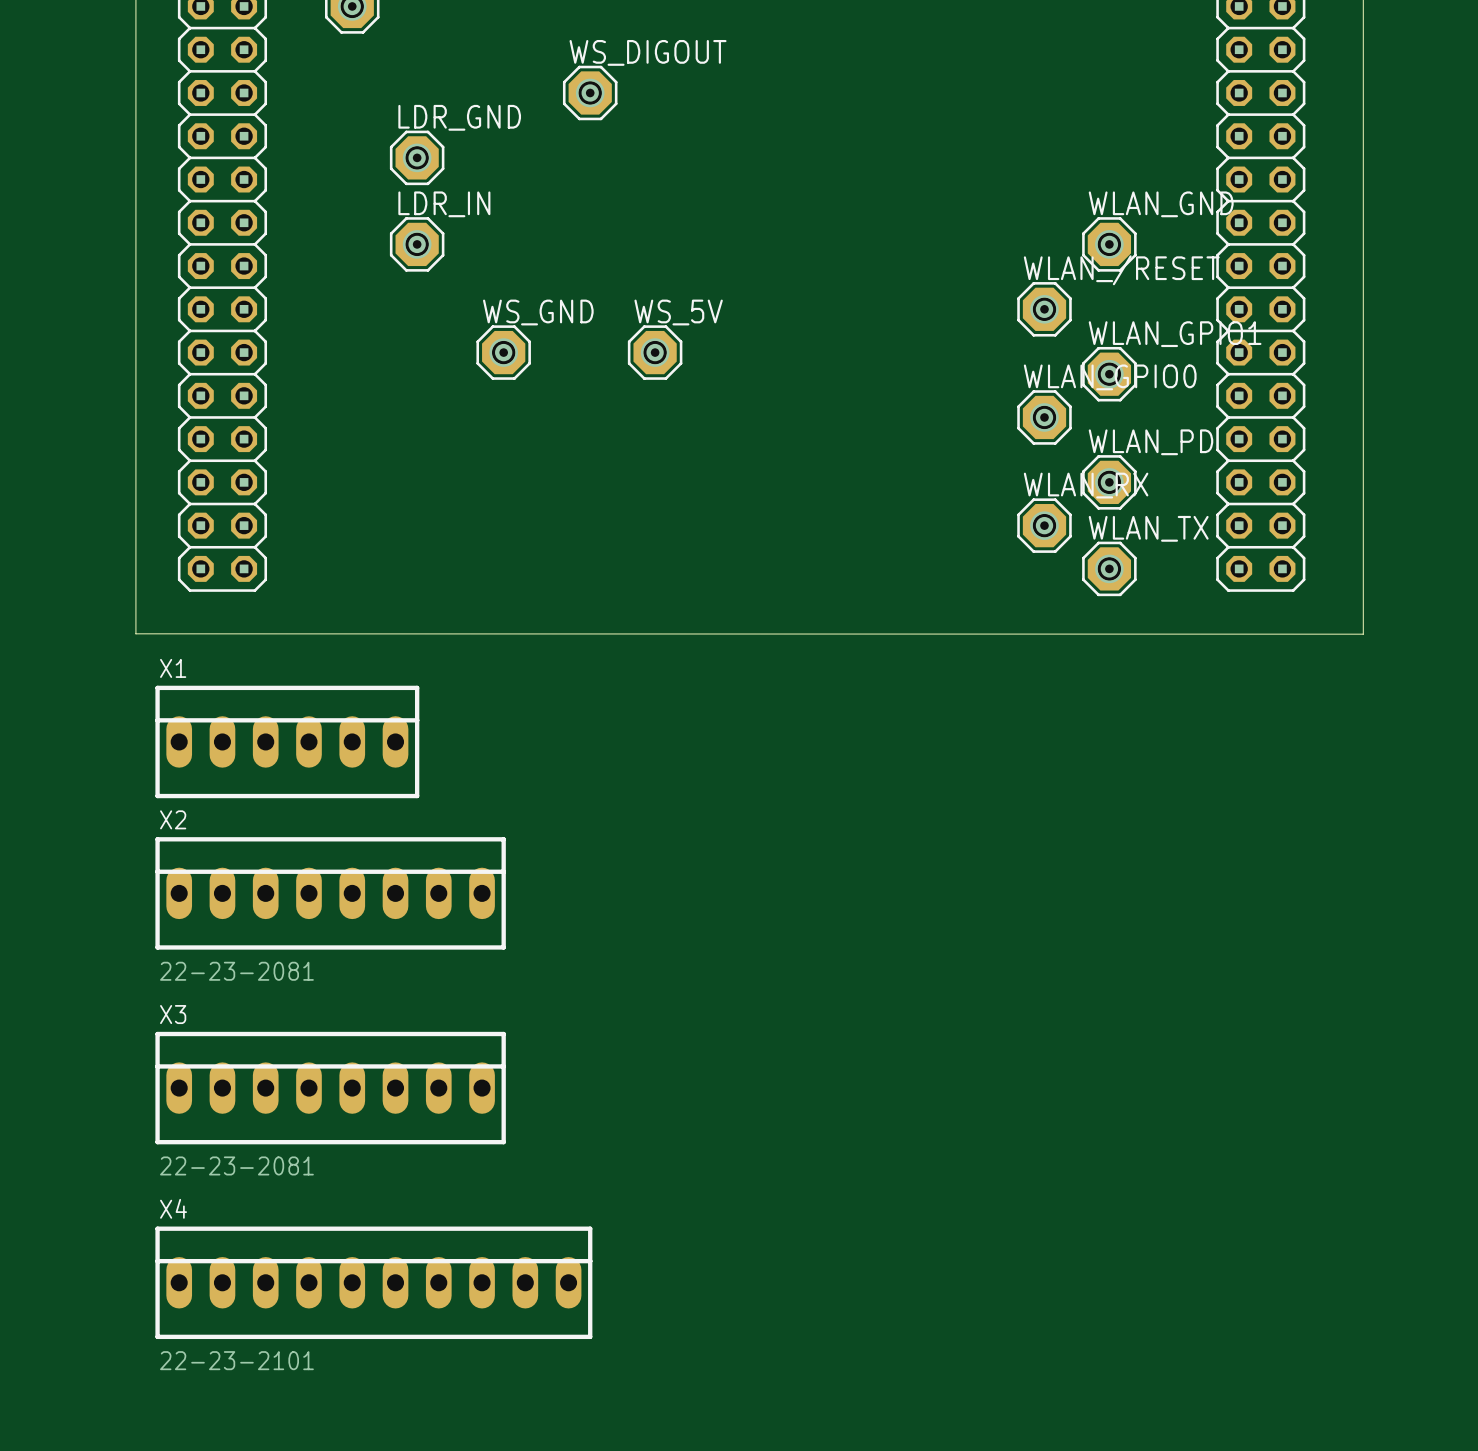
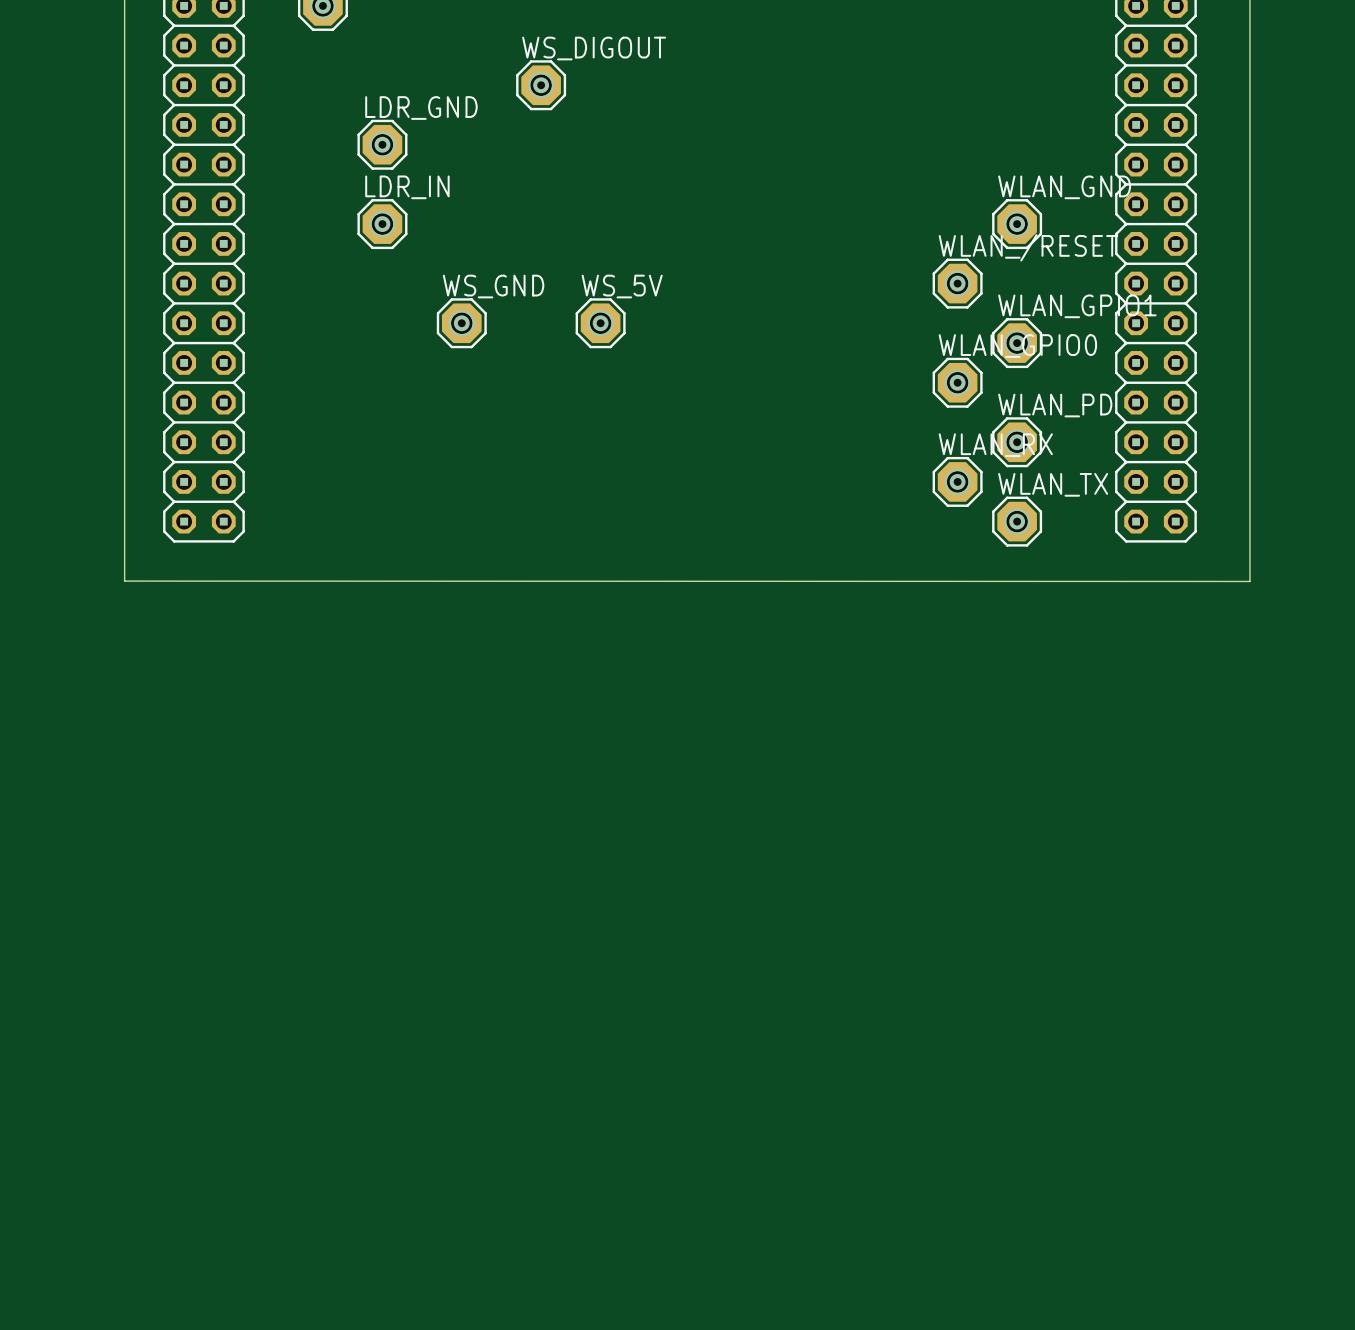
X1: (287, 741) -> none
X2: 22-23-2081 (330, 893) -> none
X3: 22-23-2081 (330, 1088) -> none
X4: 22-23-2101 (373, 1282) -> none

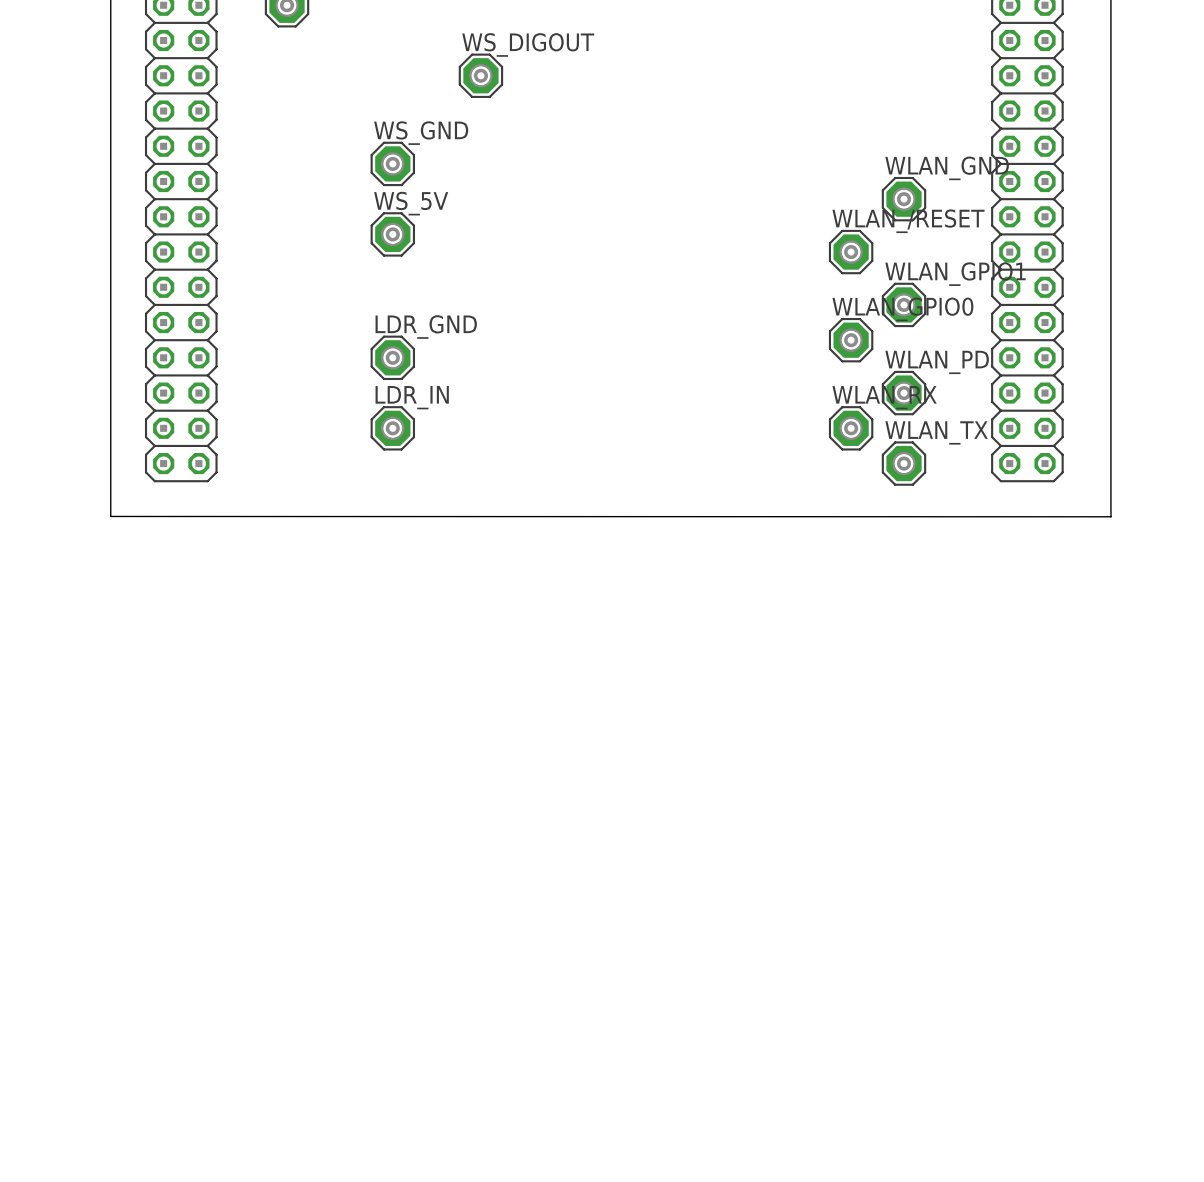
LDR_GND position: (382, 144) -> (392, 357)
LDR_IN position: (382, 224) -> (392, 428)
WS_GND position: (461, 323) -> (392, 163)
WS_5V position: (600, 323) -> (392, 234)

